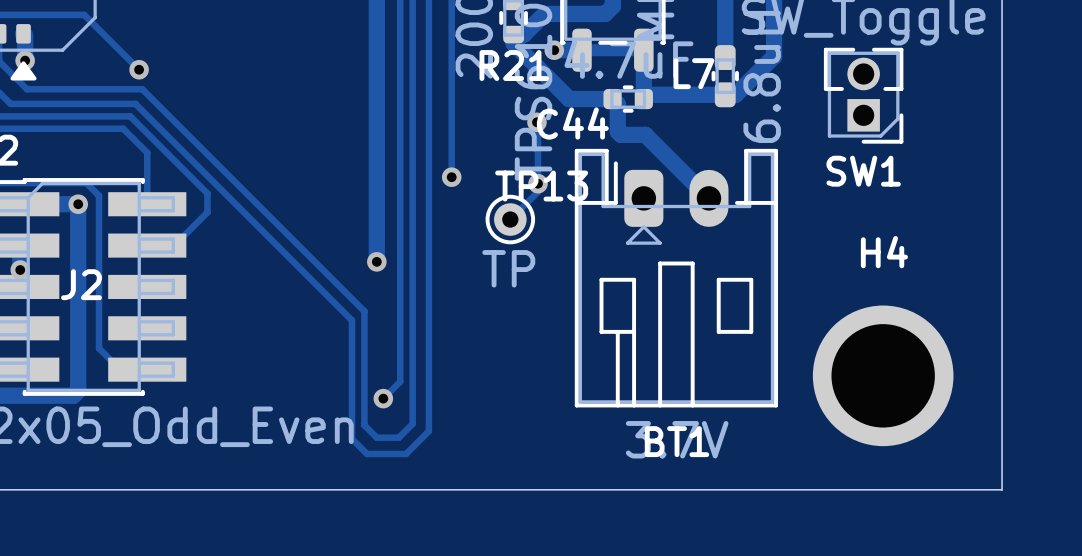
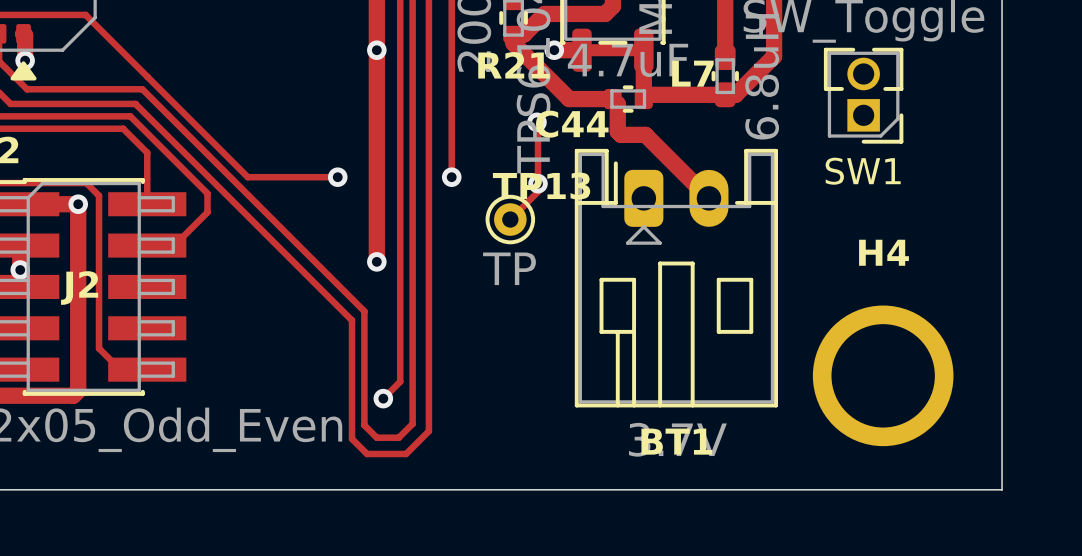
track: (84, 14) (139, 69) -> (84, 14) (247, 177) (337, 177)
via: none -> (376, 50)
via: (139, 69) -> none
via: none -> (337, 177)

